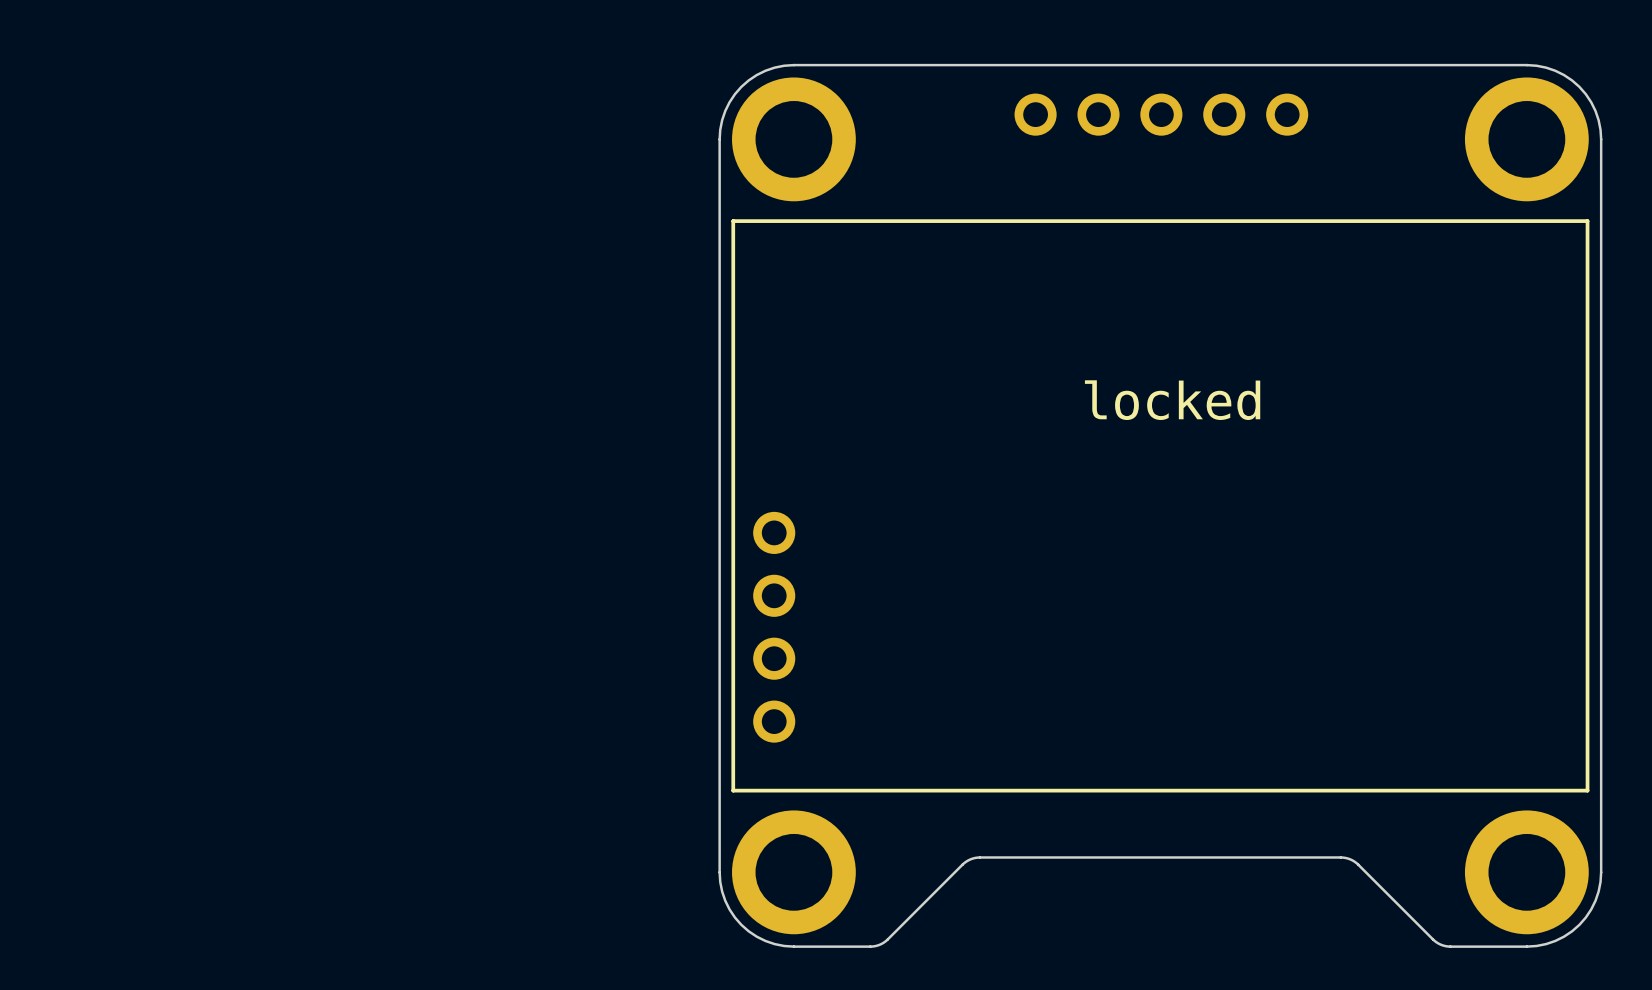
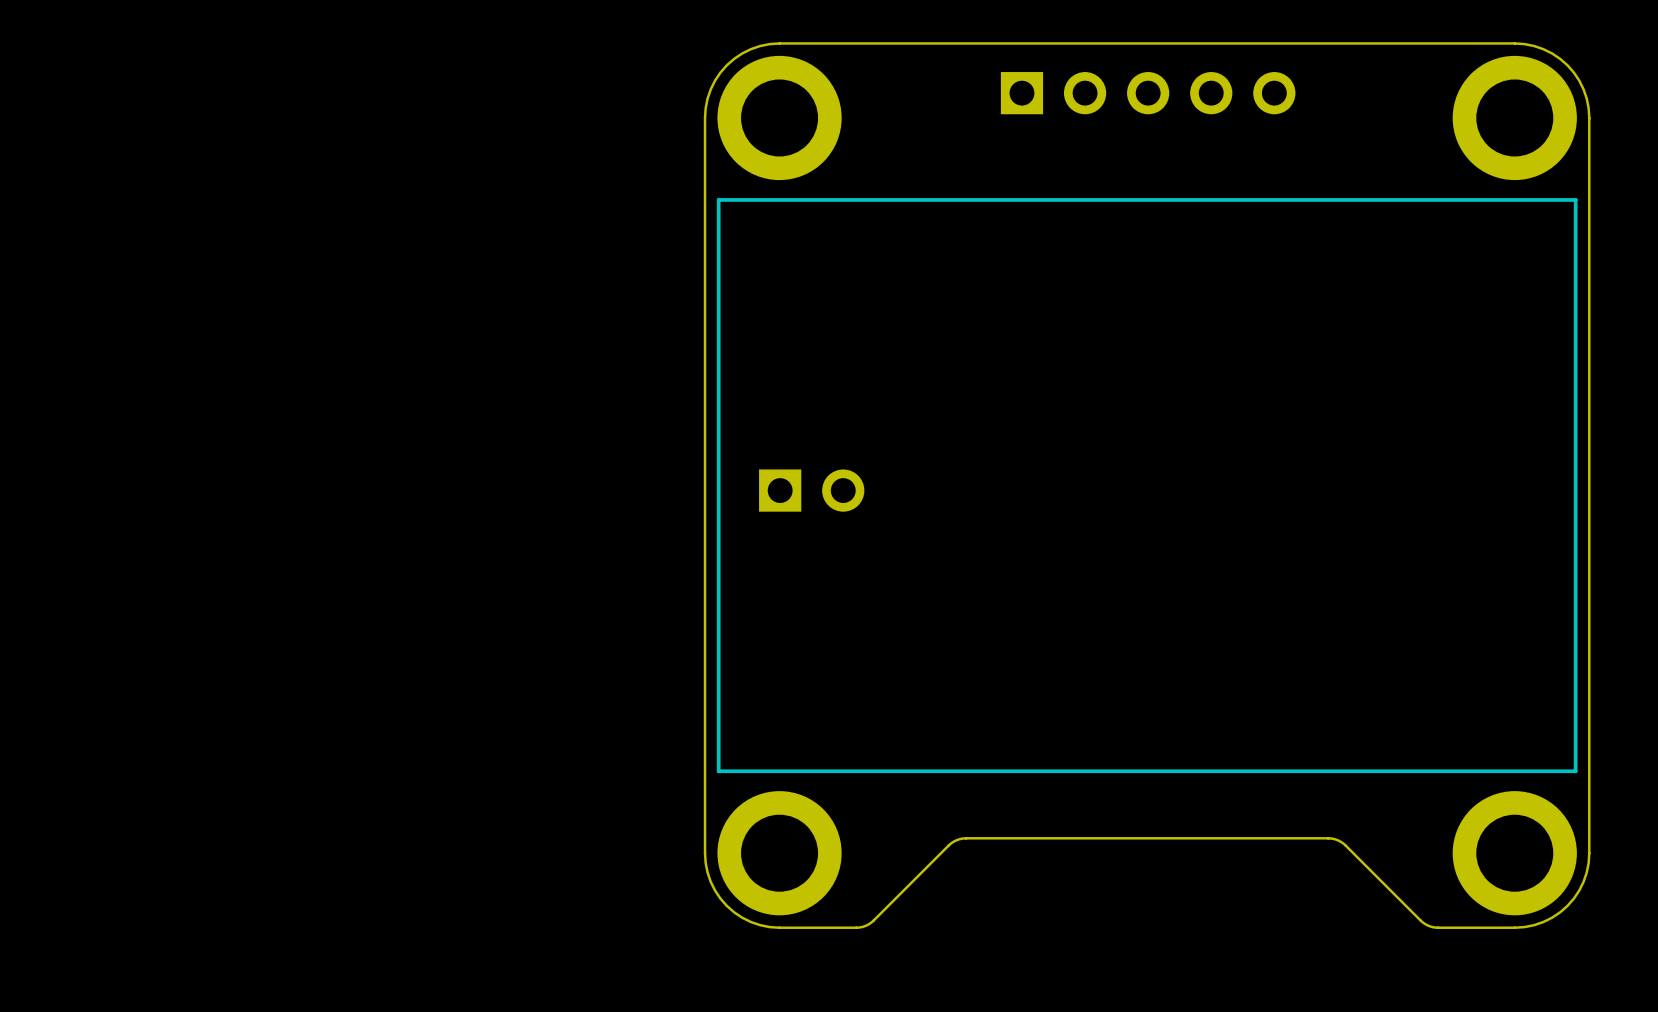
part footprint: [1014, 93, 1309, 136] -> [1000, 72, 1296, 115]
text: locked (1172, 400) -> none
part: none -> (811, 490)
part: (774, 627) -> none

